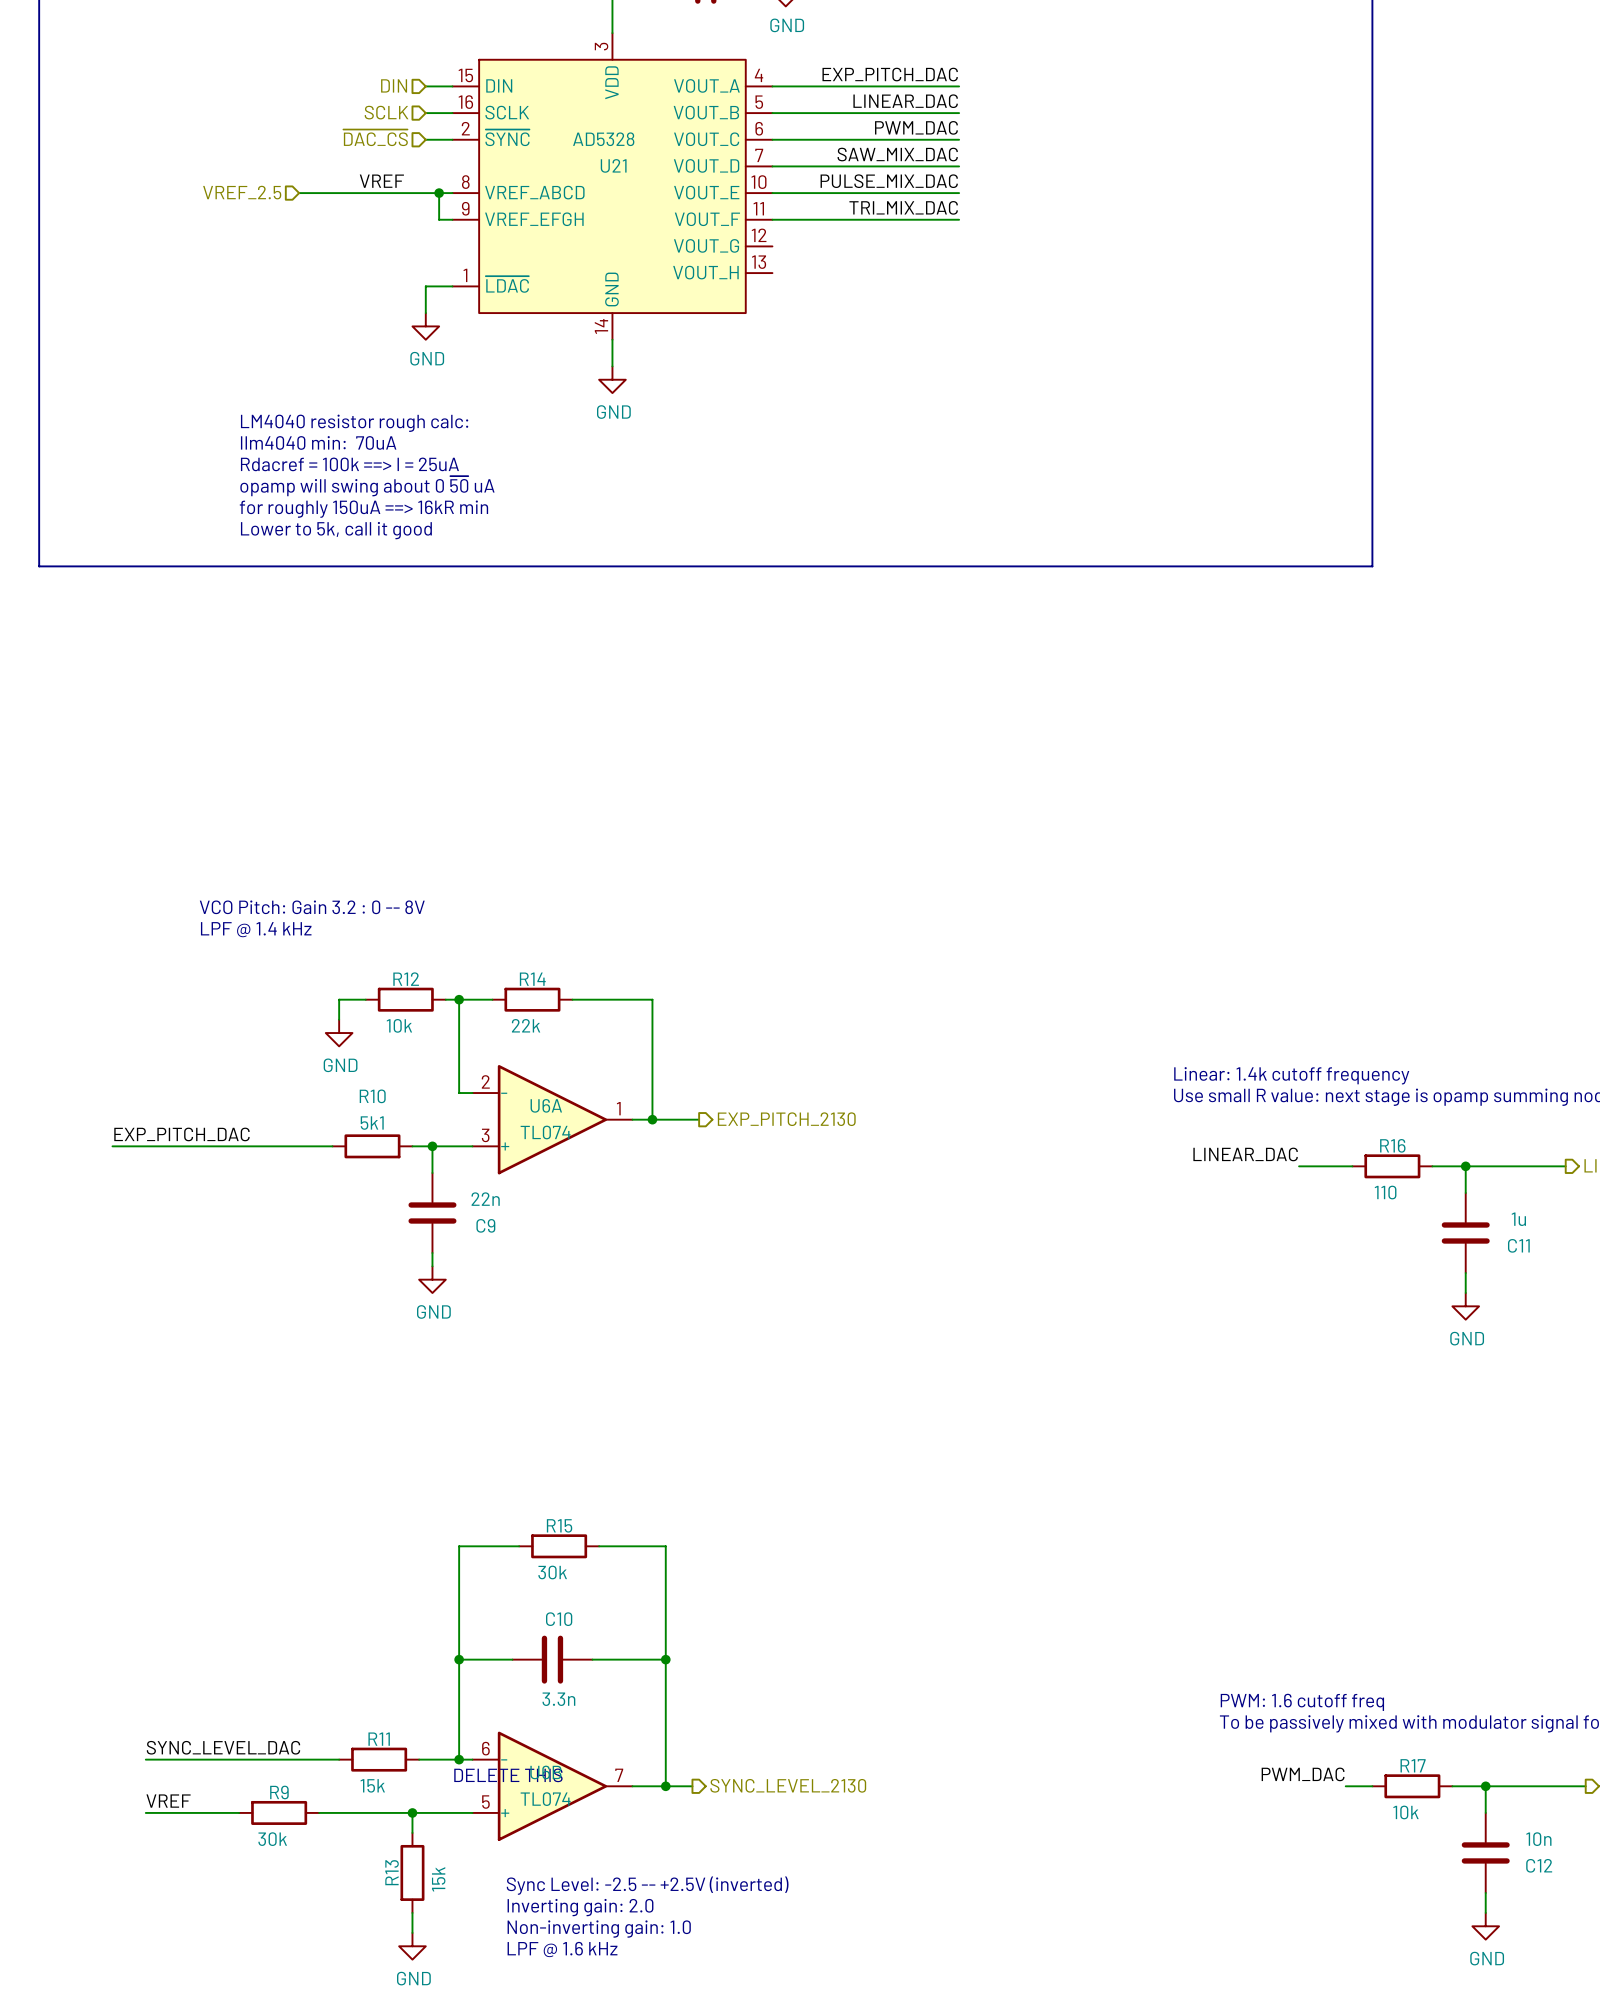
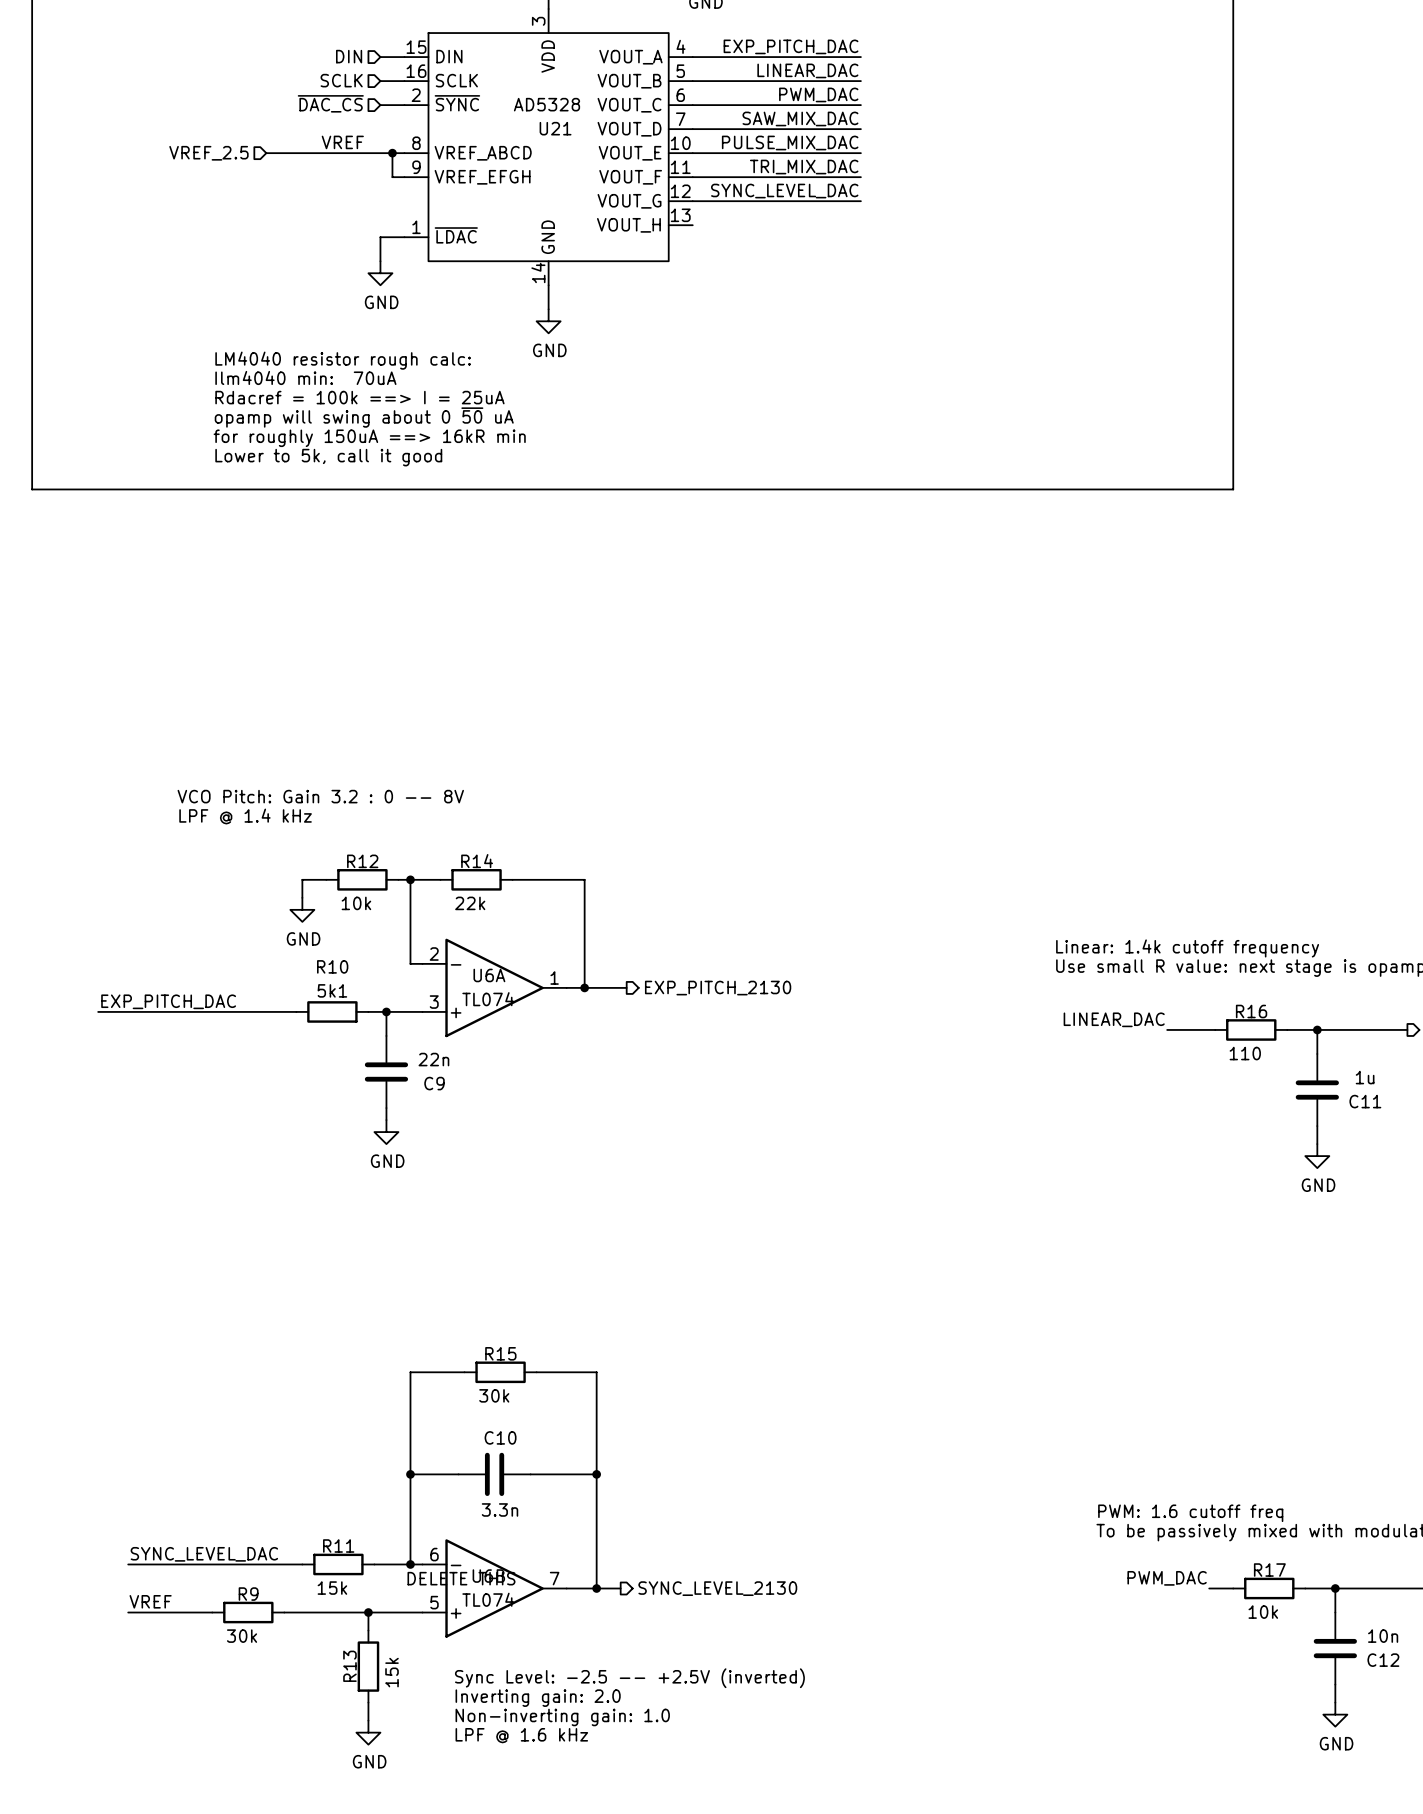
label: none -> SYNC_LEVEL_DAC (784, 191)
wire: none -> (692, 201) (860, 201)

